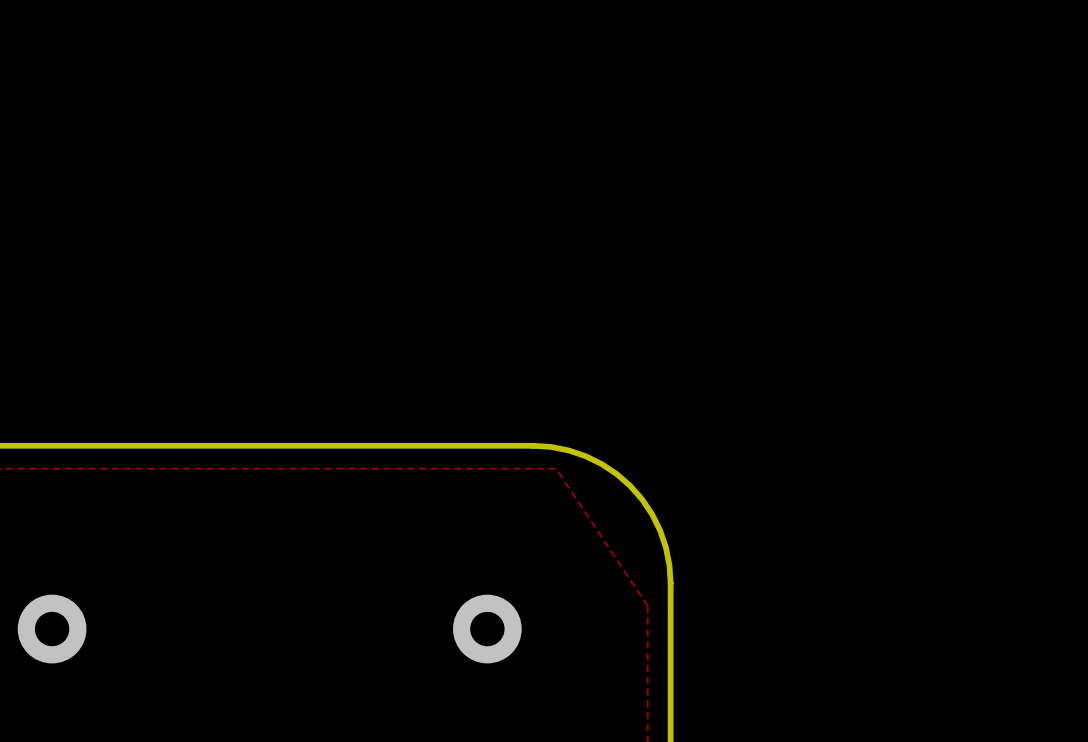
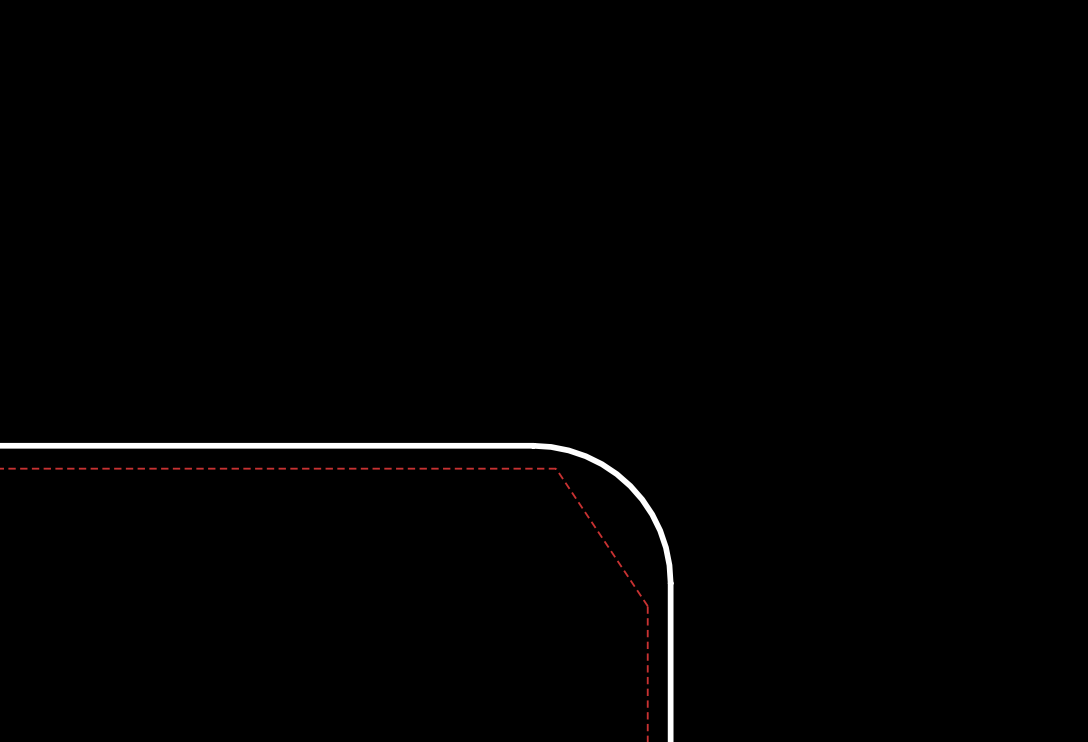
via: (52, 629) -> none
via: (487, 629) -> none

